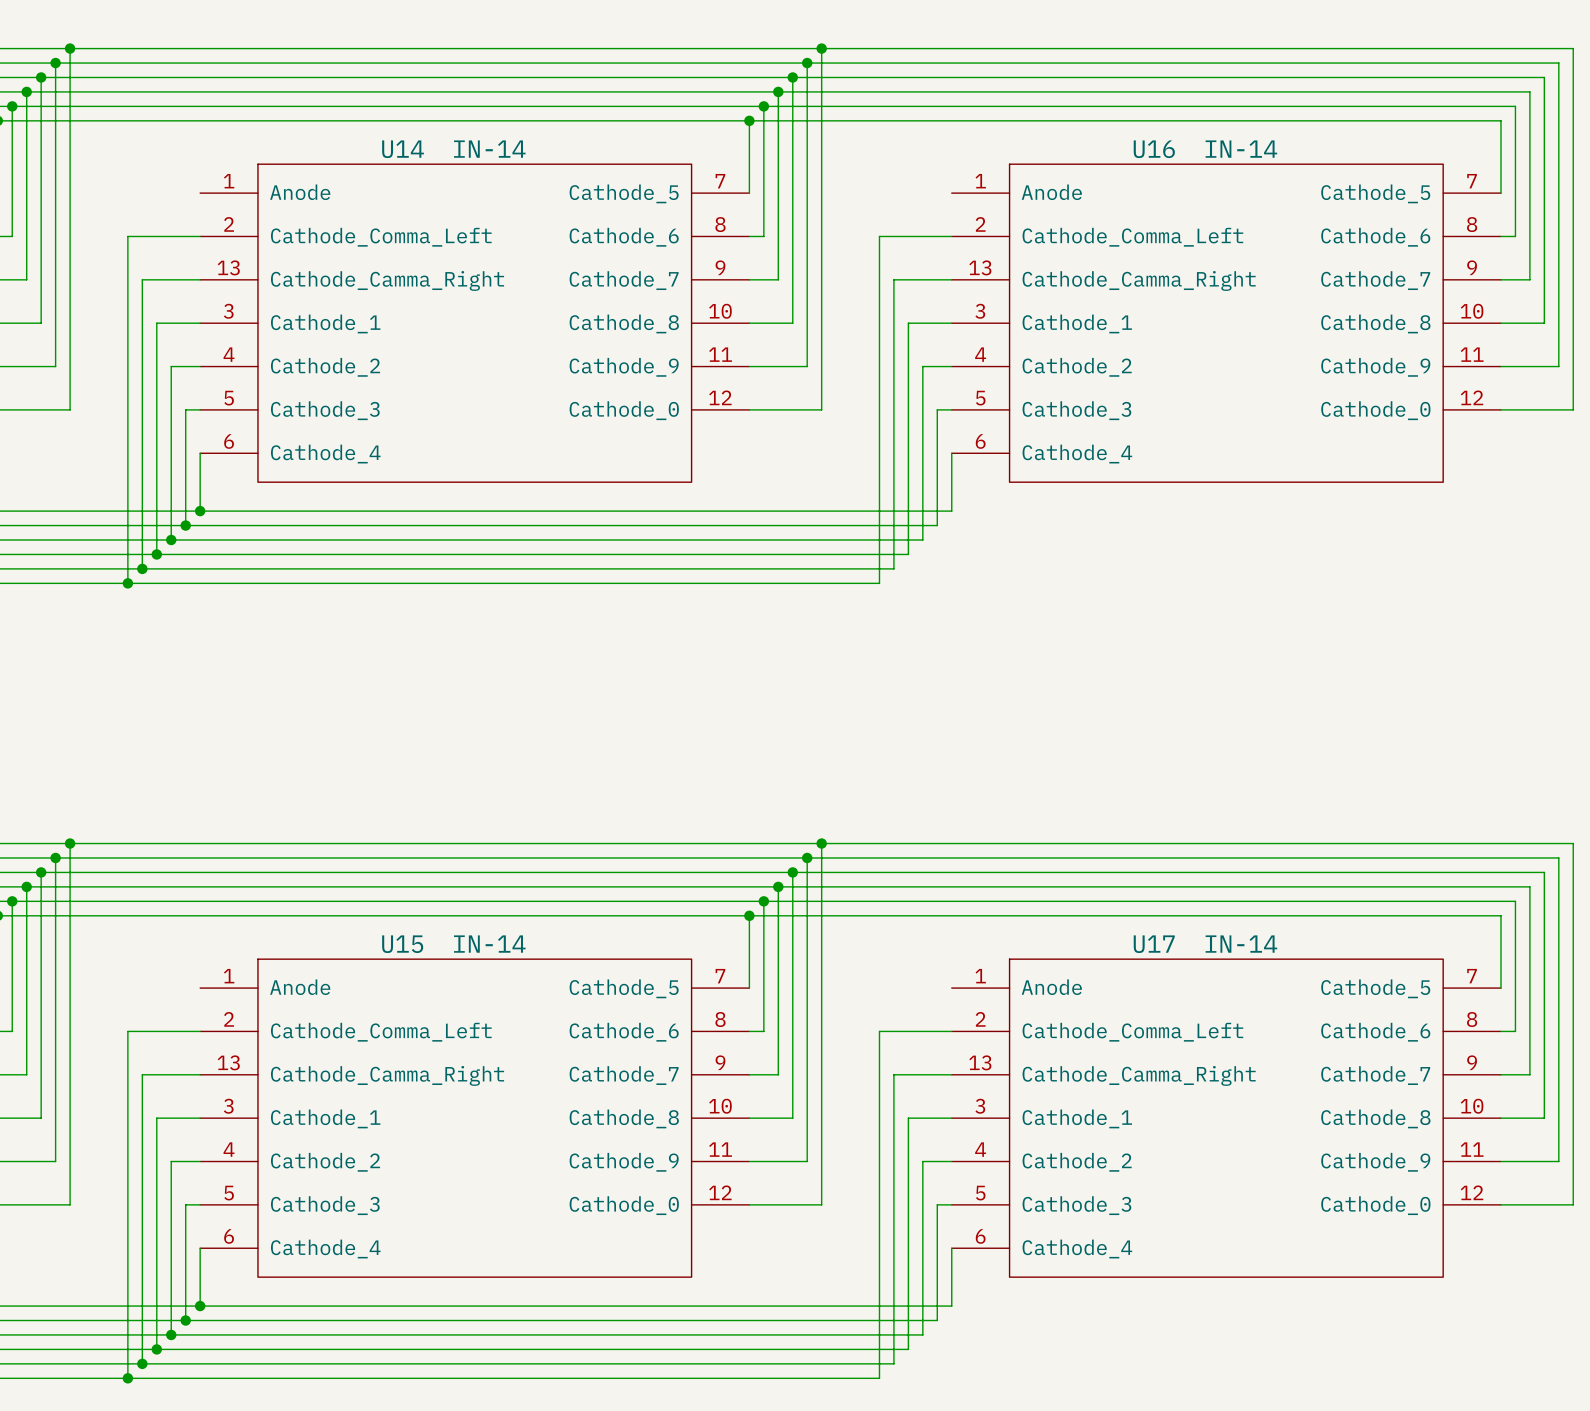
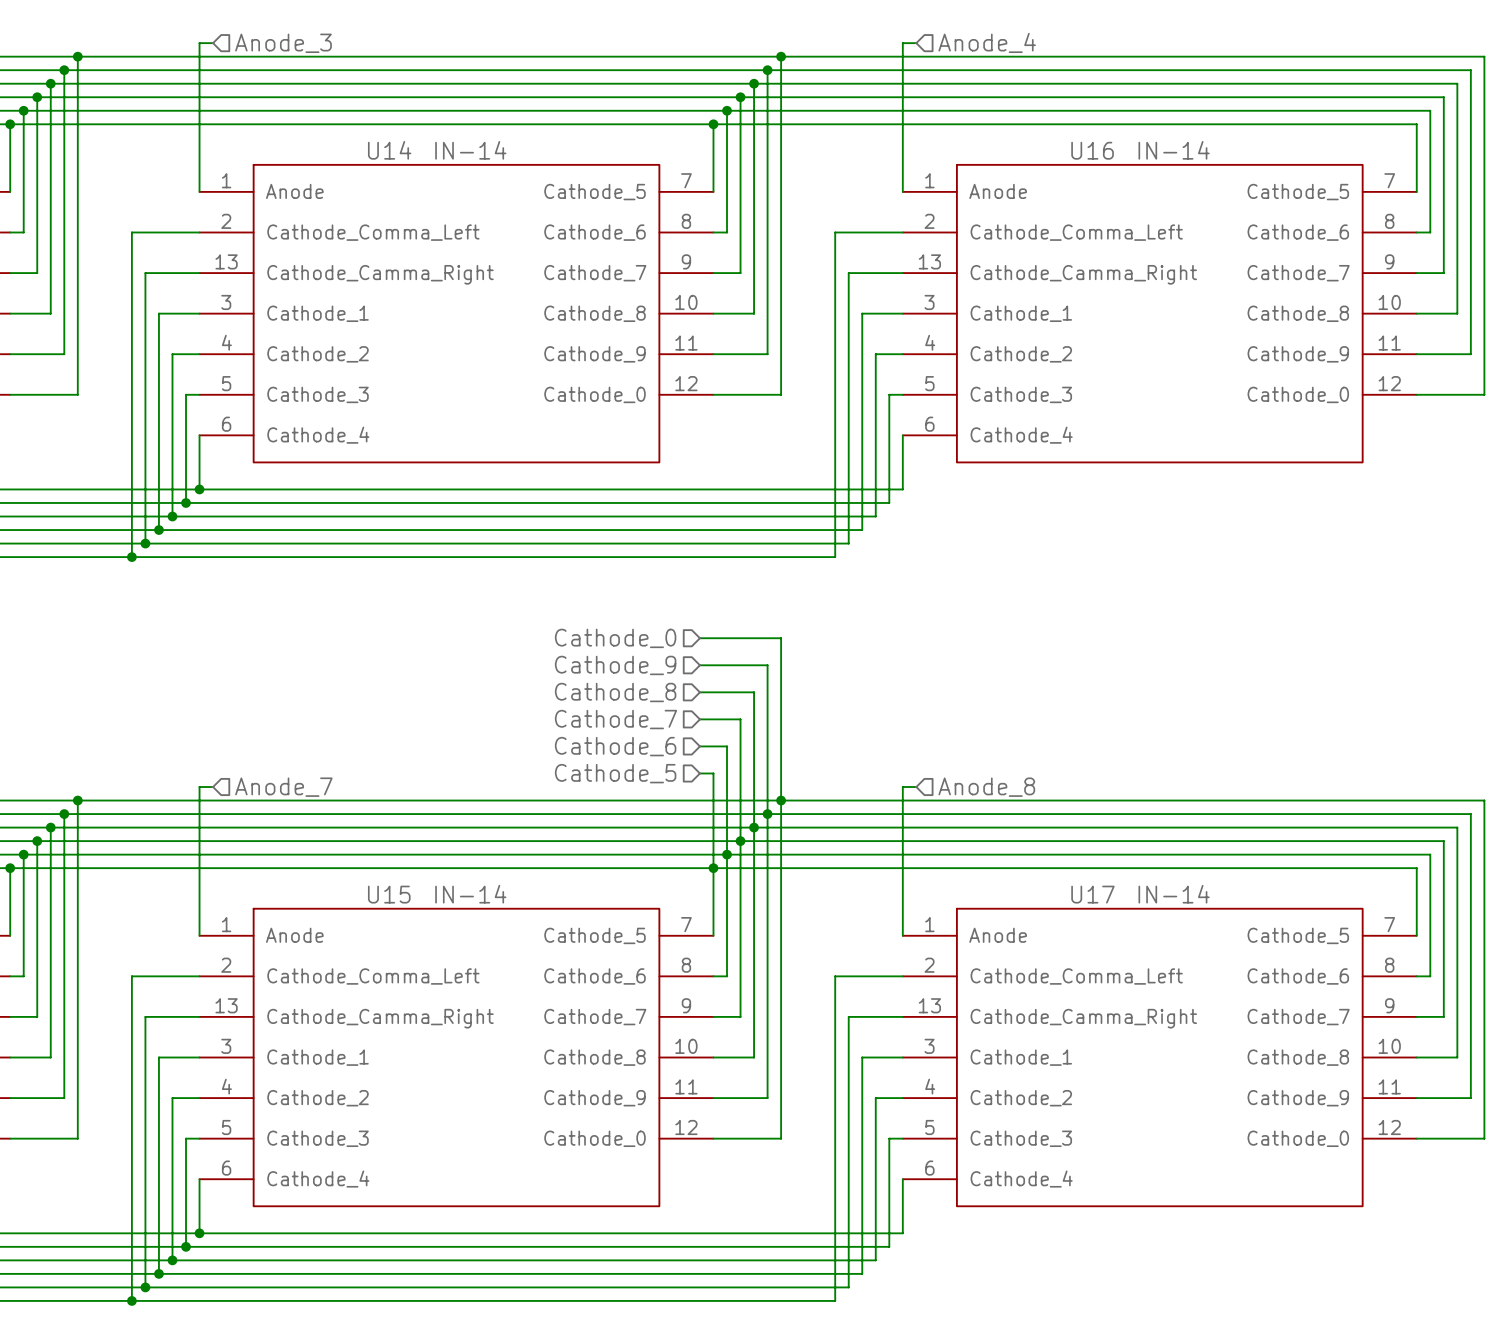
wire: none -> (213, 43) (199, 43) (199, 191)
wire: none -> (916, 43) (902, 43) (902, 191)
hierarchical label: none -> Anode_3 (283, 43)
hierarchical label: none -> Anode_4 (987, 42)
wire: none -> (699, 638) (781, 638) (781, 800)
hierarchical label: none -> Cathode_0 (615, 638)
wire: none -> (699, 665) (767, 665) (767, 814)
hierarchical label: none -> Cathode_9 (615, 665)
wire: none -> (699, 692) (754, 692) (754, 827)
hierarchical label: none -> Cathode_8 (615, 692)
wire: none -> (699, 719) (740, 719) (740, 841)
hierarchical label: none -> Cathode_7 (616, 719)
wire: none -> (699, 746) (727, 746) (727, 854)
hierarchical label: none -> Cathode_6 (615, 746)
wire: none -> (699, 773) (713, 773) (713, 868)
hierarchical label: none -> Cathode_5 (615, 773)
wire: none -> (213, 787) (199, 787) (199, 935)
wire: none -> (916, 787) (902, 787) (902, 935)
hierarchical label: none -> Anode_7 (283, 787)
hierarchical label: none -> Anode_8 (986, 787)

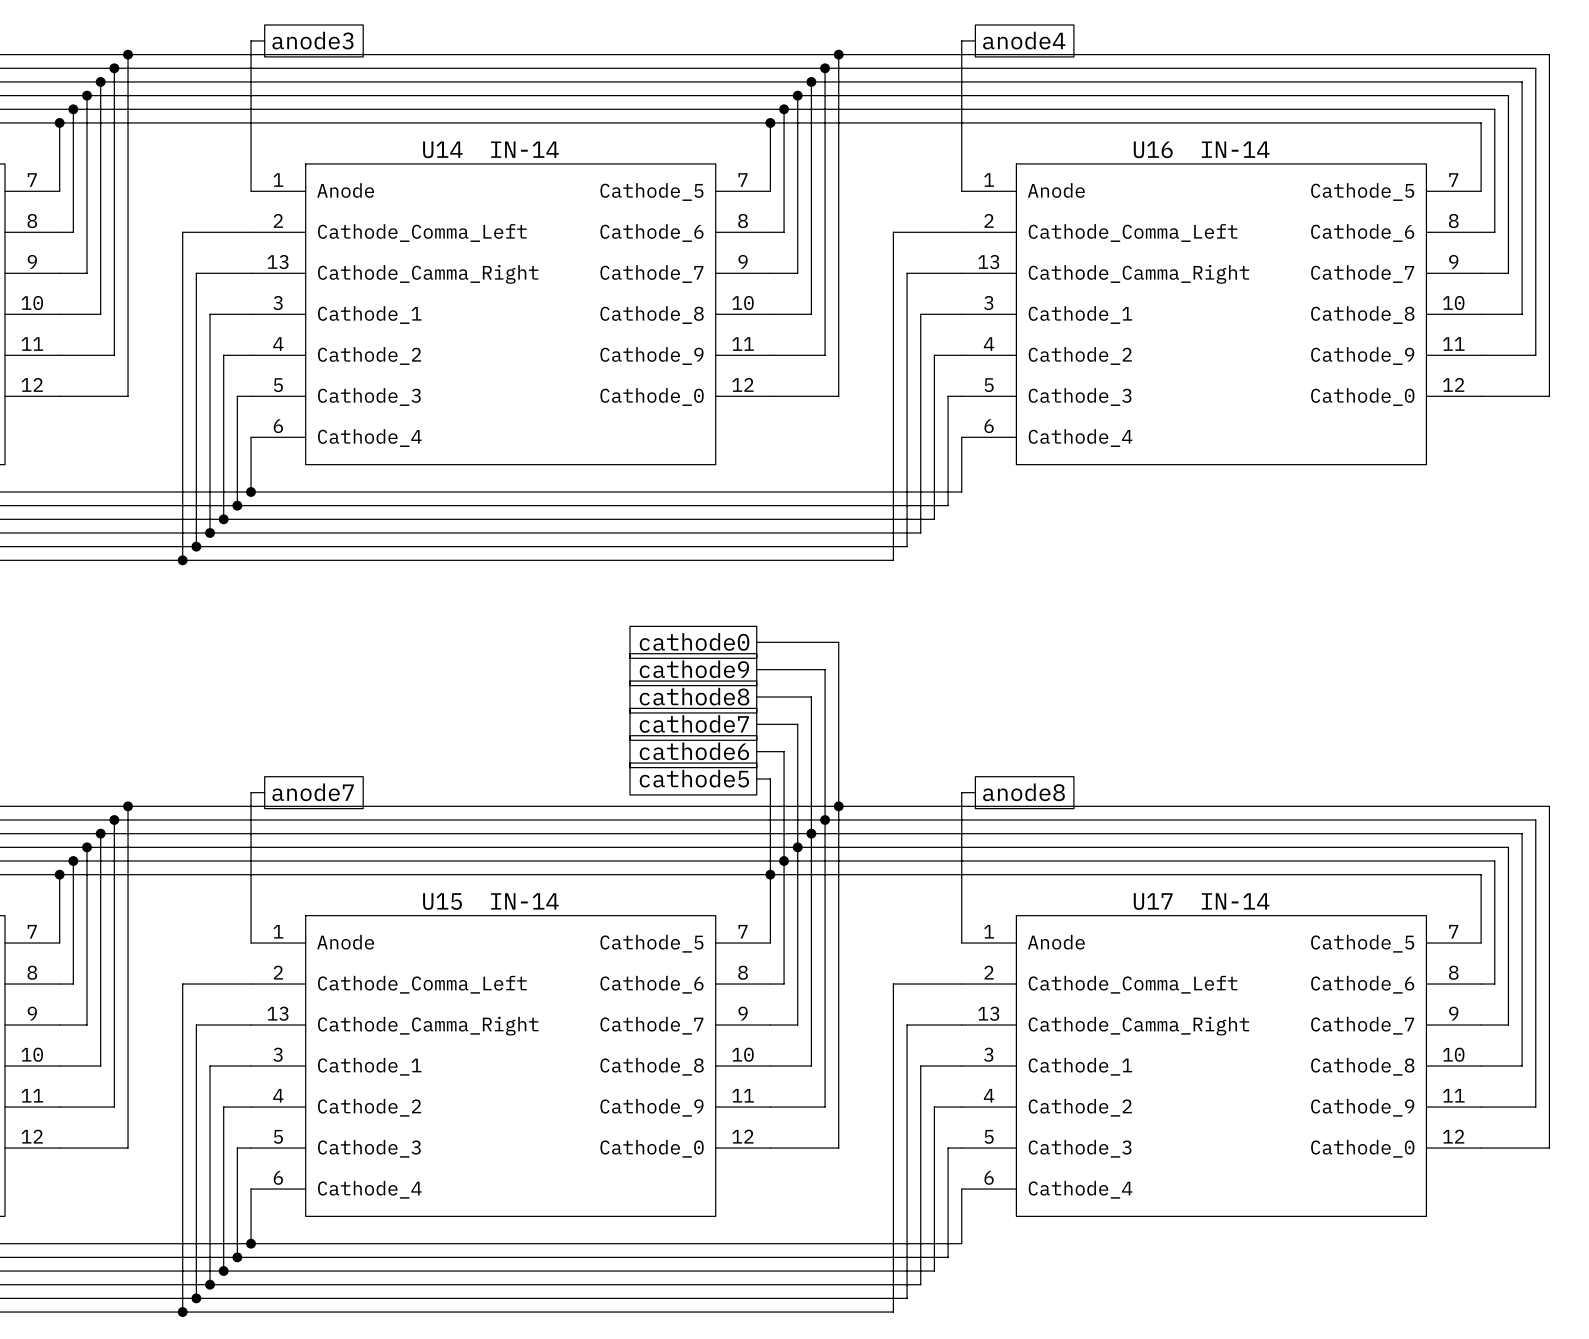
global label: none -> anode4 (1024, 40)
hierarchical label: Anode_4 (987, 42) -> none
global label: none -> anode3 (312, 40)
hierarchical label: Anode_3 (283, 43) -> none
hierarchical label: Cathode_0 (615, 638) -> none
global label: none -> cathode0 (694, 641)
hierarchical label: Cathode_9 (615, 665) -> none
global label: none -> cathode9 (694, 669)
hierarchical label: Cathode_8 (615, 692) -> none
global label: none -> cathode8 (694, 696)
hierarchical label: Cathode_7 (616, 719) -> none
global label: none -> cathode7 (694, 723)
hierarchical label: Cathode_6 (615, 746) -> none
global label: none -> cathode6 (694, 751)
hierarchical label: Cathode_5 (615, 773) -> none
global label: none -> cathode5 (694, 778)
global label: none -> anode7 (313, 792)
hierarchical label: Anode_7 (283, 787) -> none
global label: none -> anode8 (1023, 792)
hierarchical label: Anode_8 (986, 787) -> none

